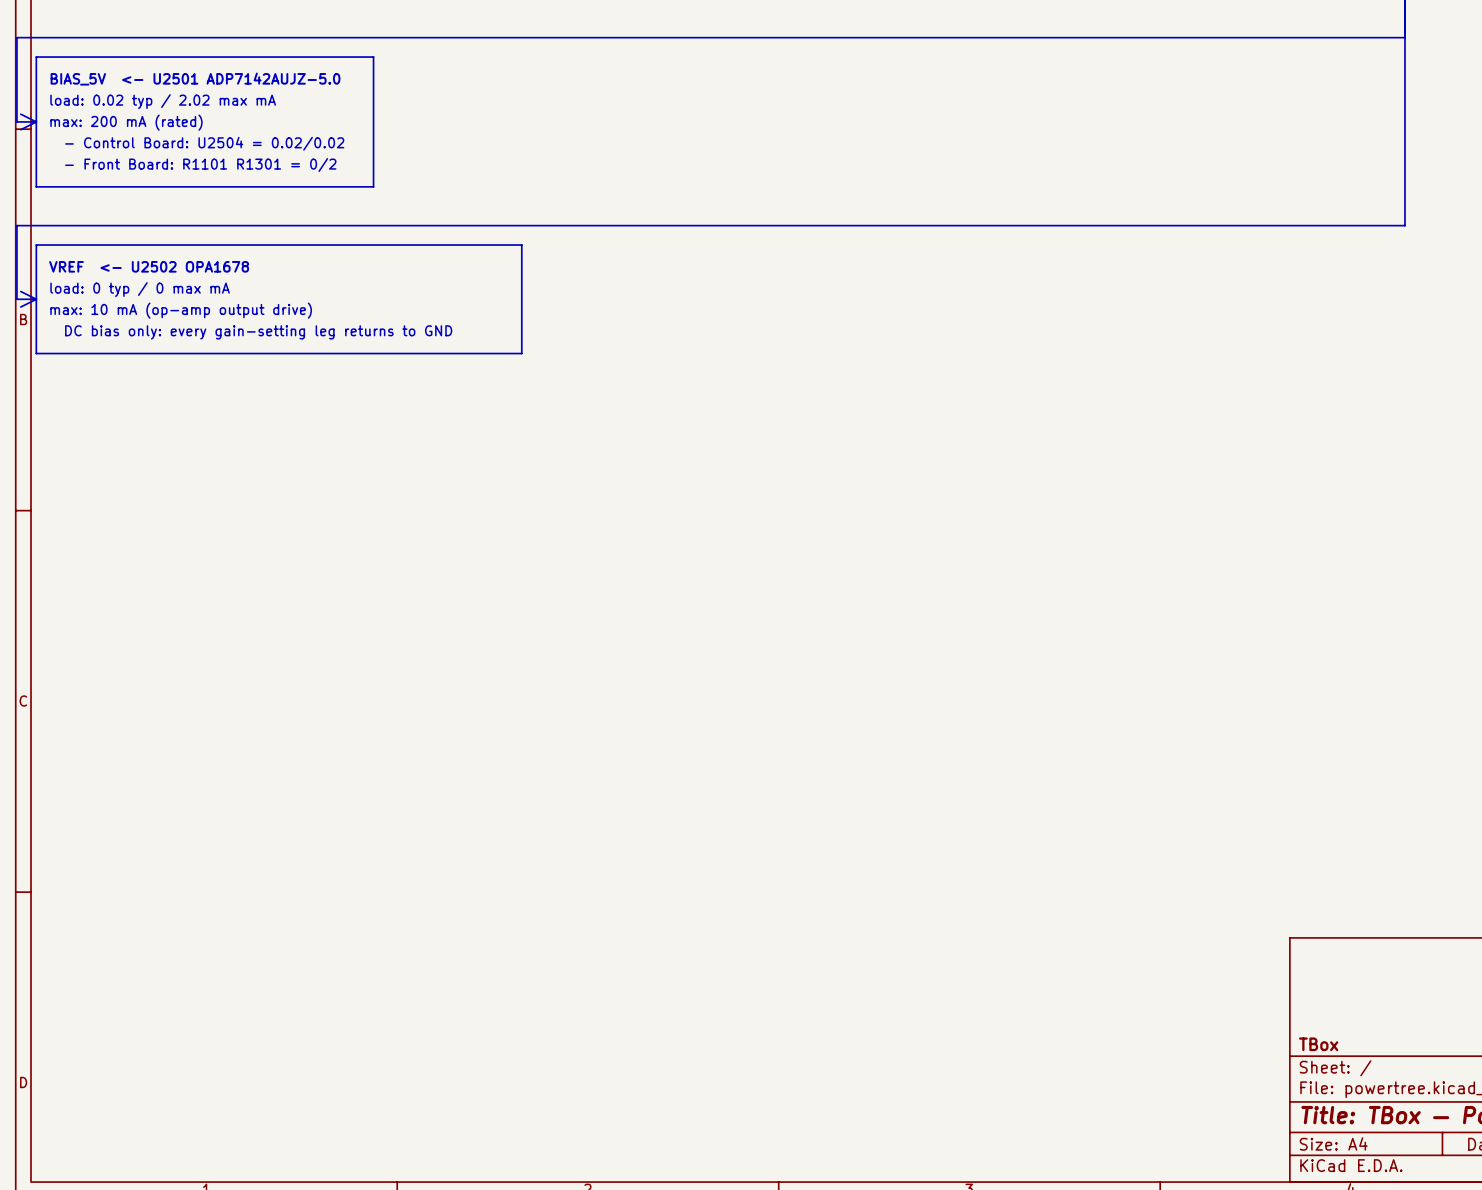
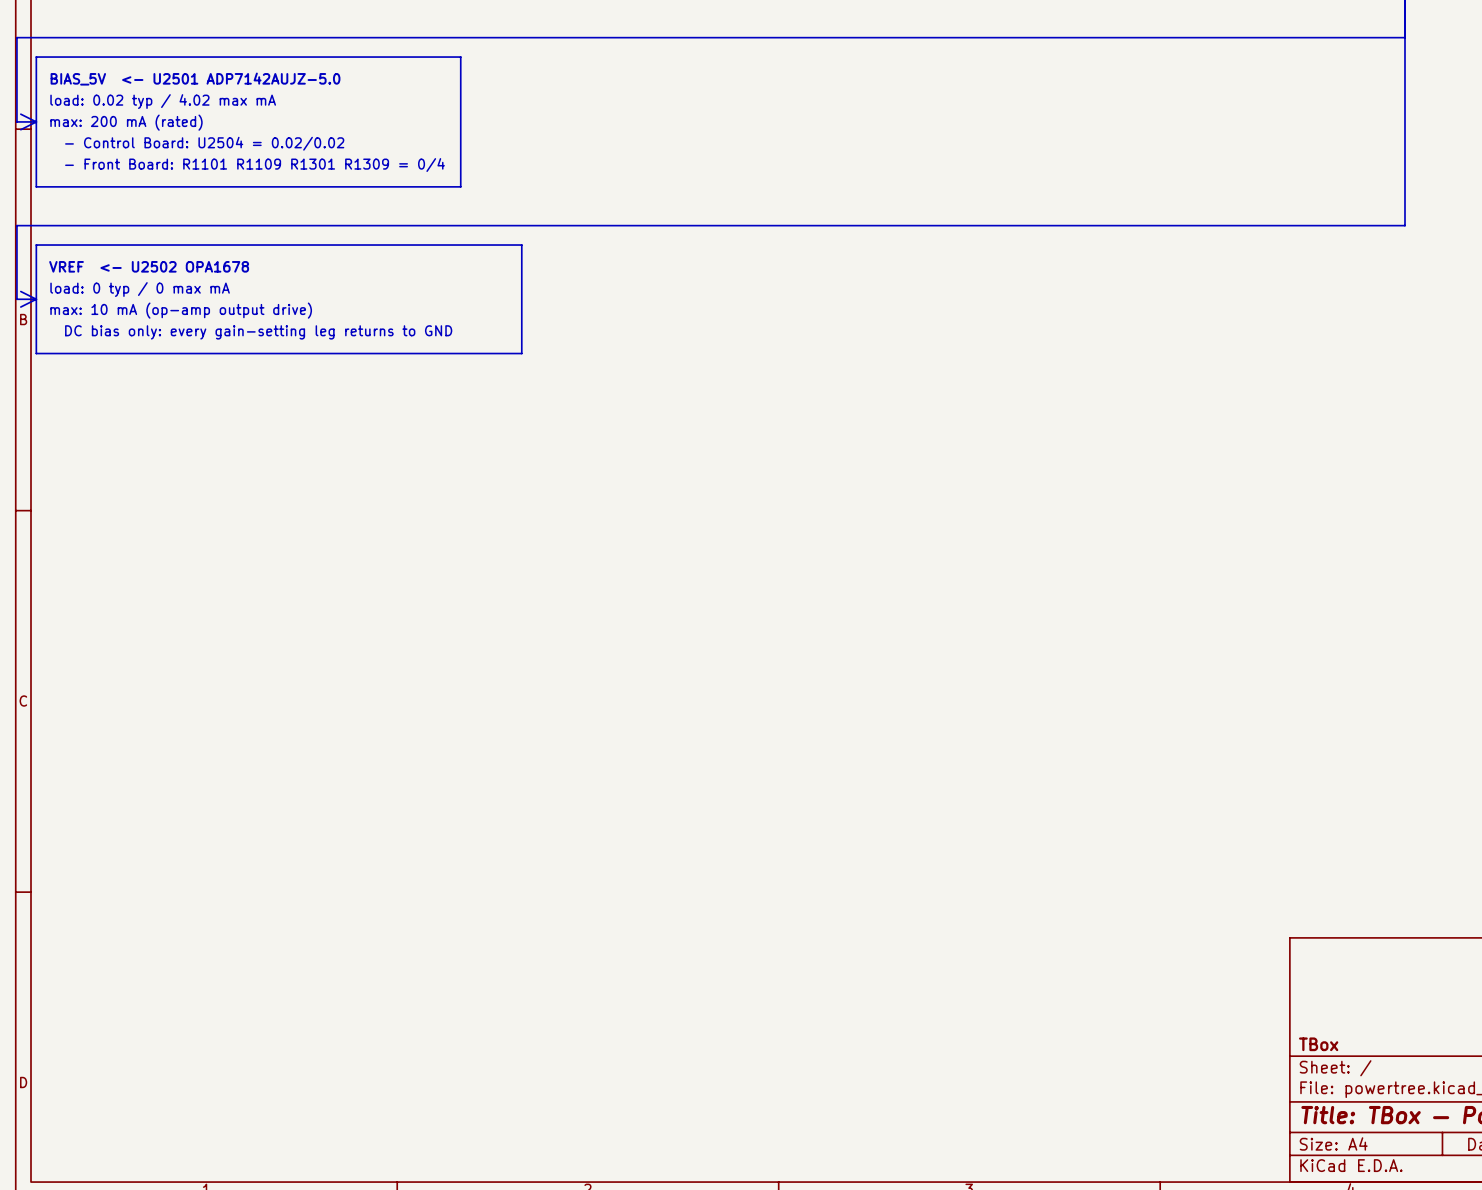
line: (373, 57) (373, 186) -> (373, 57) (460, 57) (460, 186) (373, 186)
text: load: 0.02 typ / 2.02 max mA (163, 101) -> load: 0.02 typ / 4.02 max mA (163, 101)
text: - Front Board: R1101 R1301 = 0/2 (200, 165) -> - Front Board: R1101 R1109 R1301 R1309 = 0/4 (254, 165)

